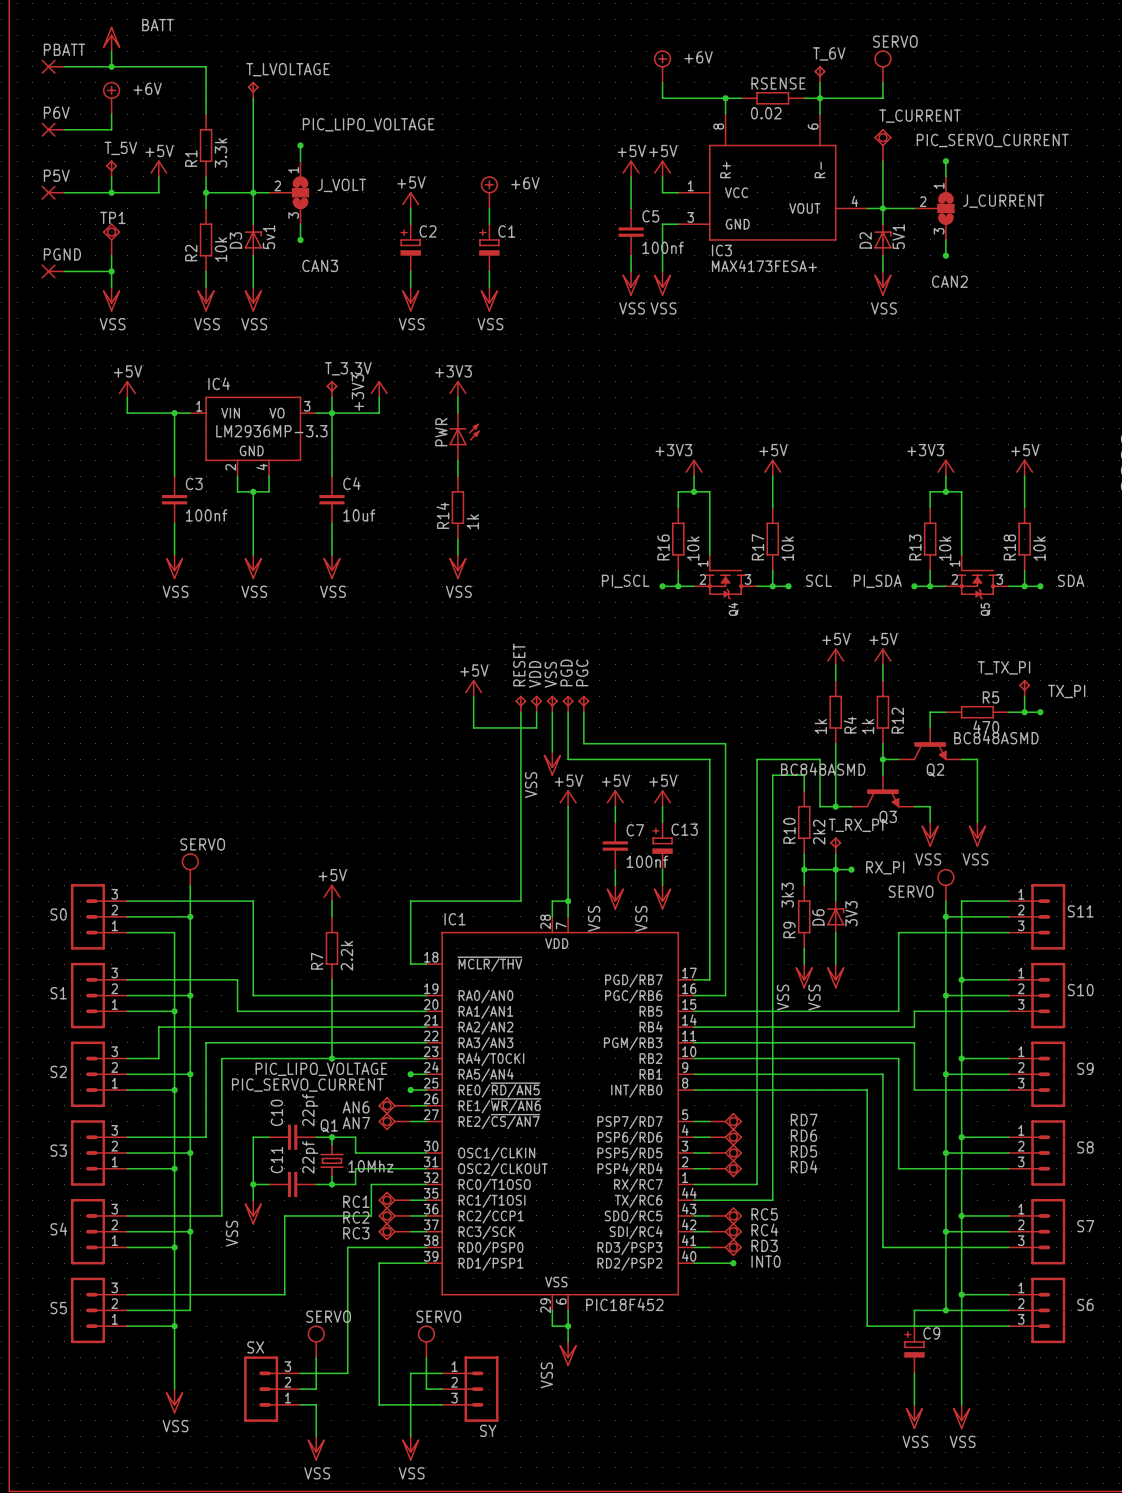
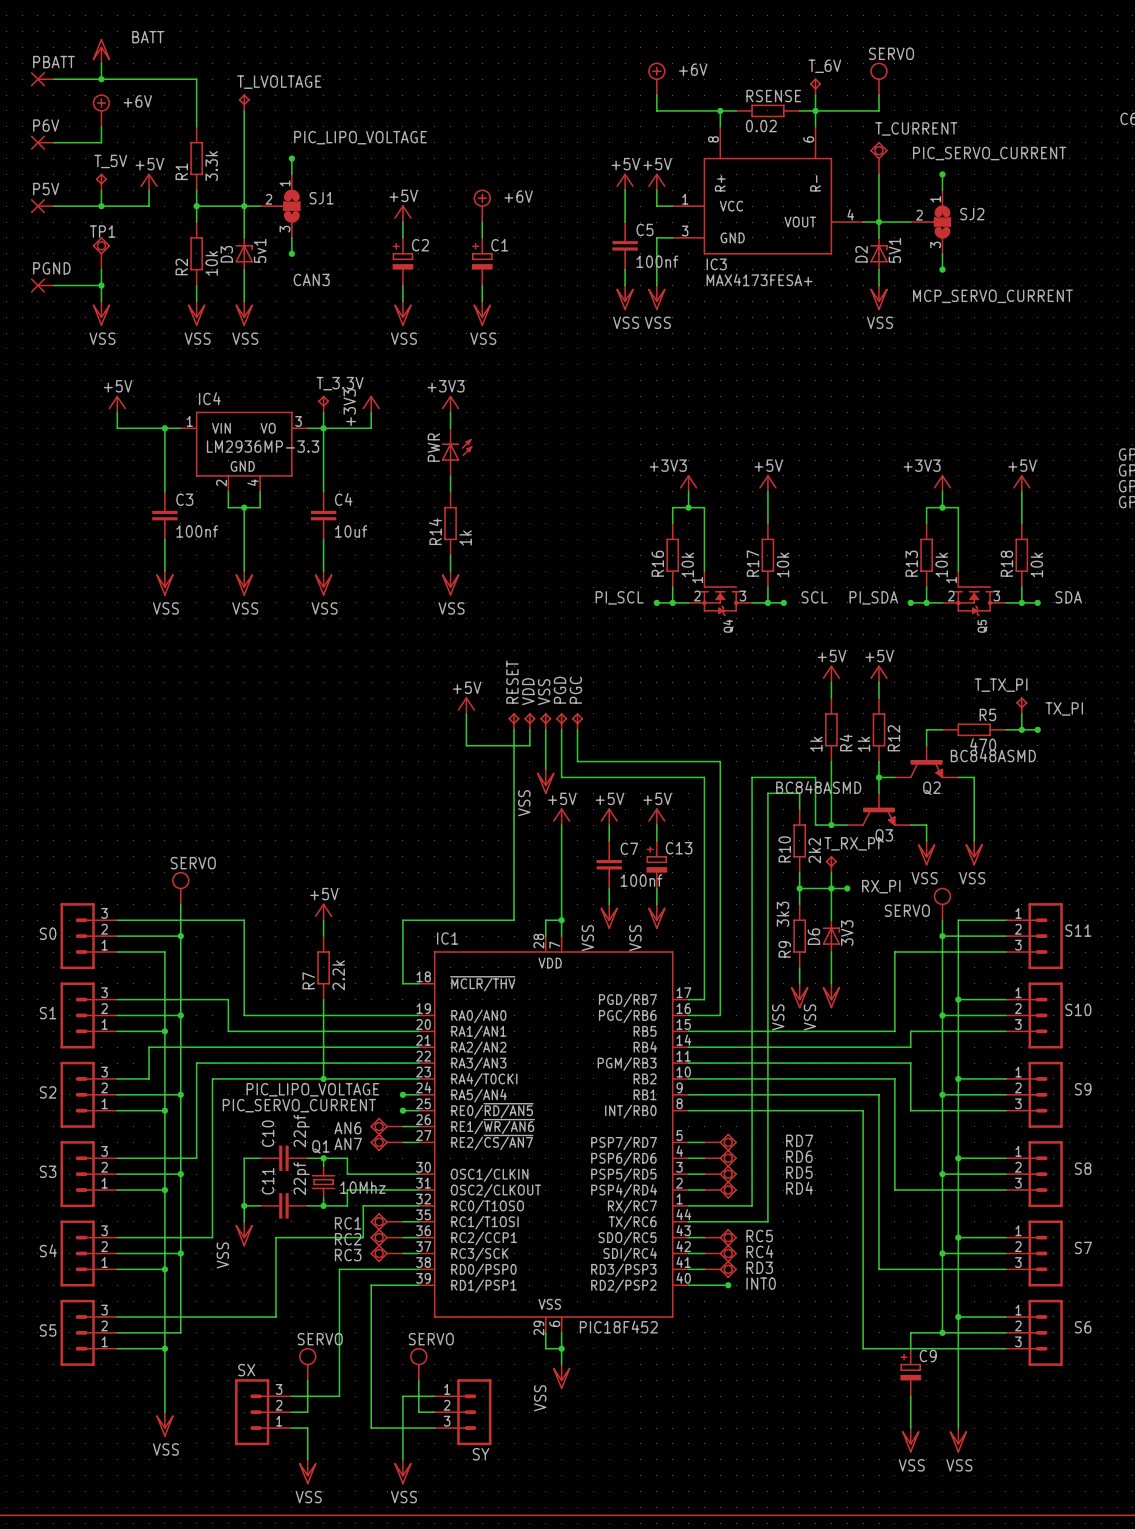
J_VOLT name: J_VOLT (341, 185) -> SJ1 (321, 198)
J_CURRENT name: J_CURRENT (1003, 201) -> SJ2 (972, 214)
label: CAN2 (949, 281) -> none
label: none -> MCP_SERVO_CURRENT (992, 296)

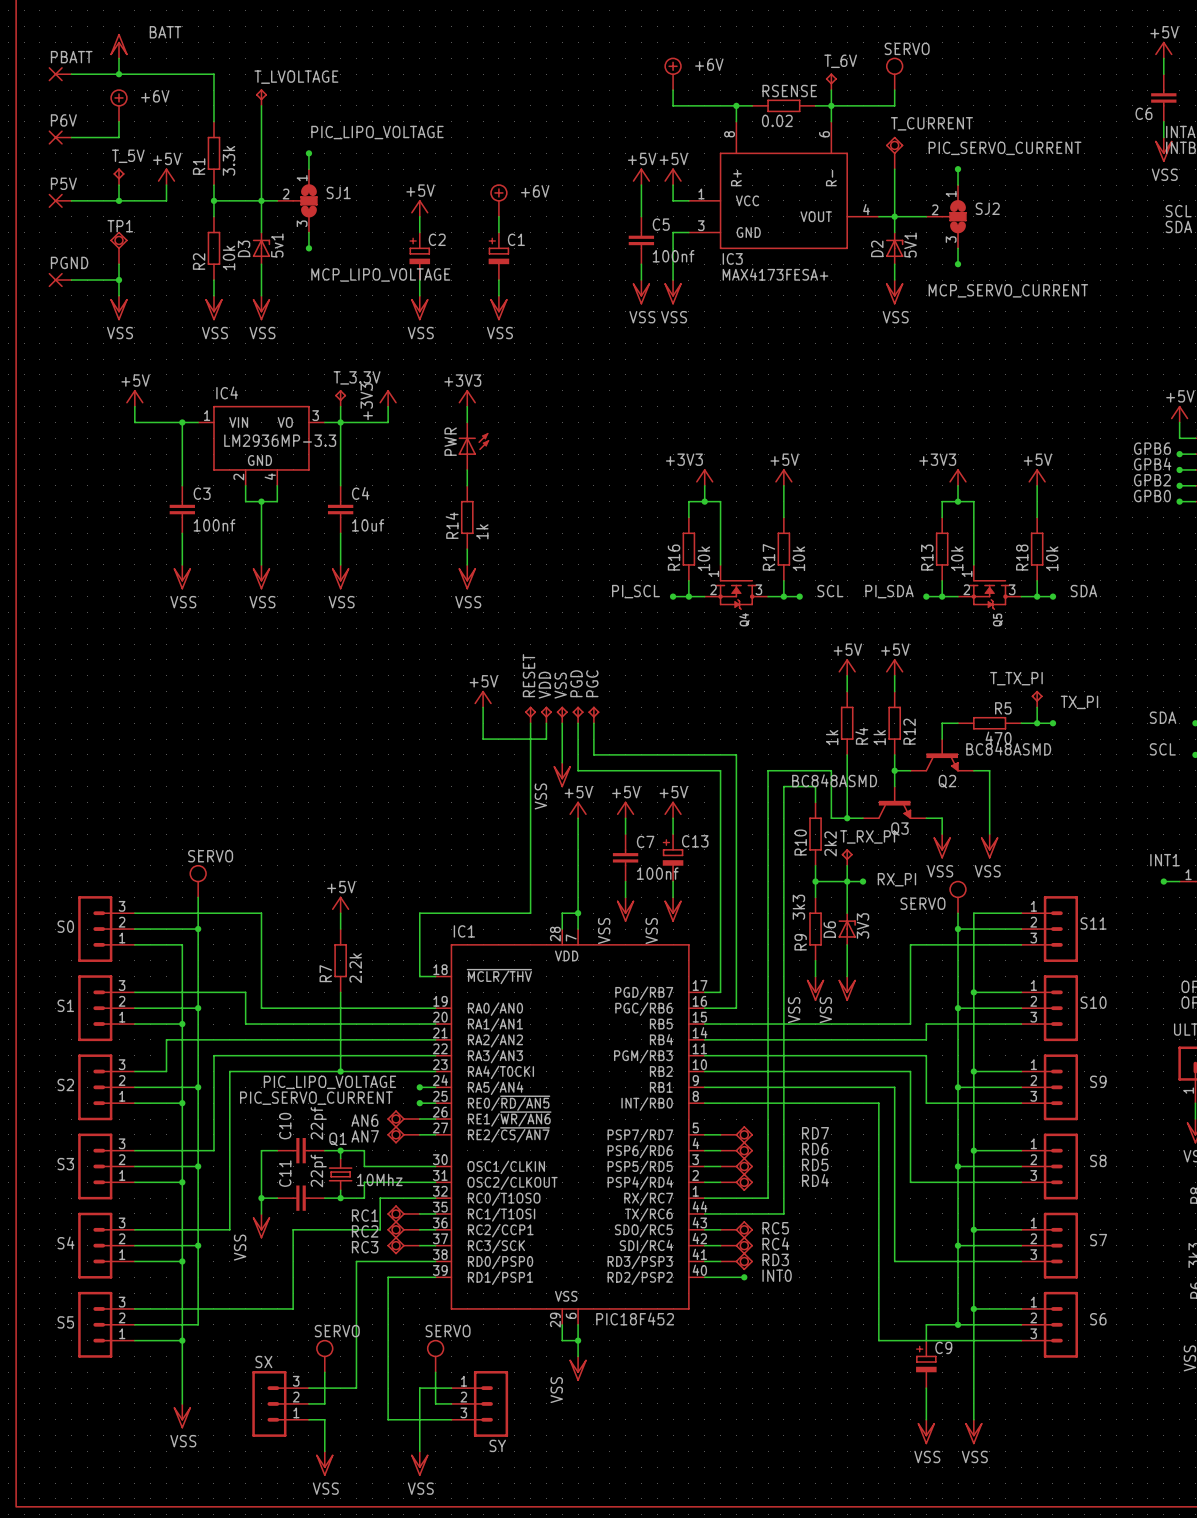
label: CAN3 (311, 279) -> MCP_LIPO_VOLTAGE (380, 274)

